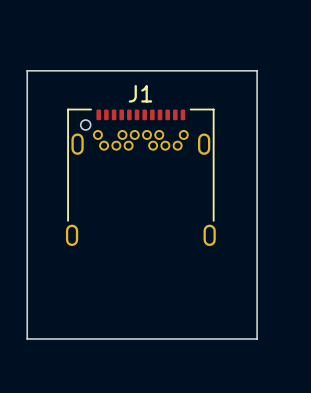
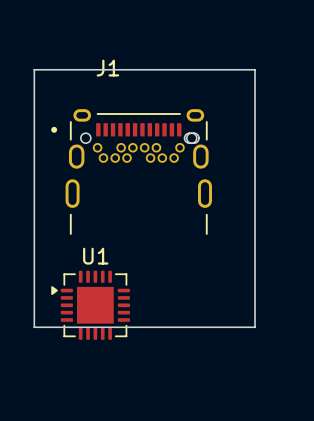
J1 name position: J1 (140, 93) -> J1 (107, 68)
J1 footprint: [65, 108, 216, 247] -> [51, 109, 212, 235]
U1: none -> (90, 305)

